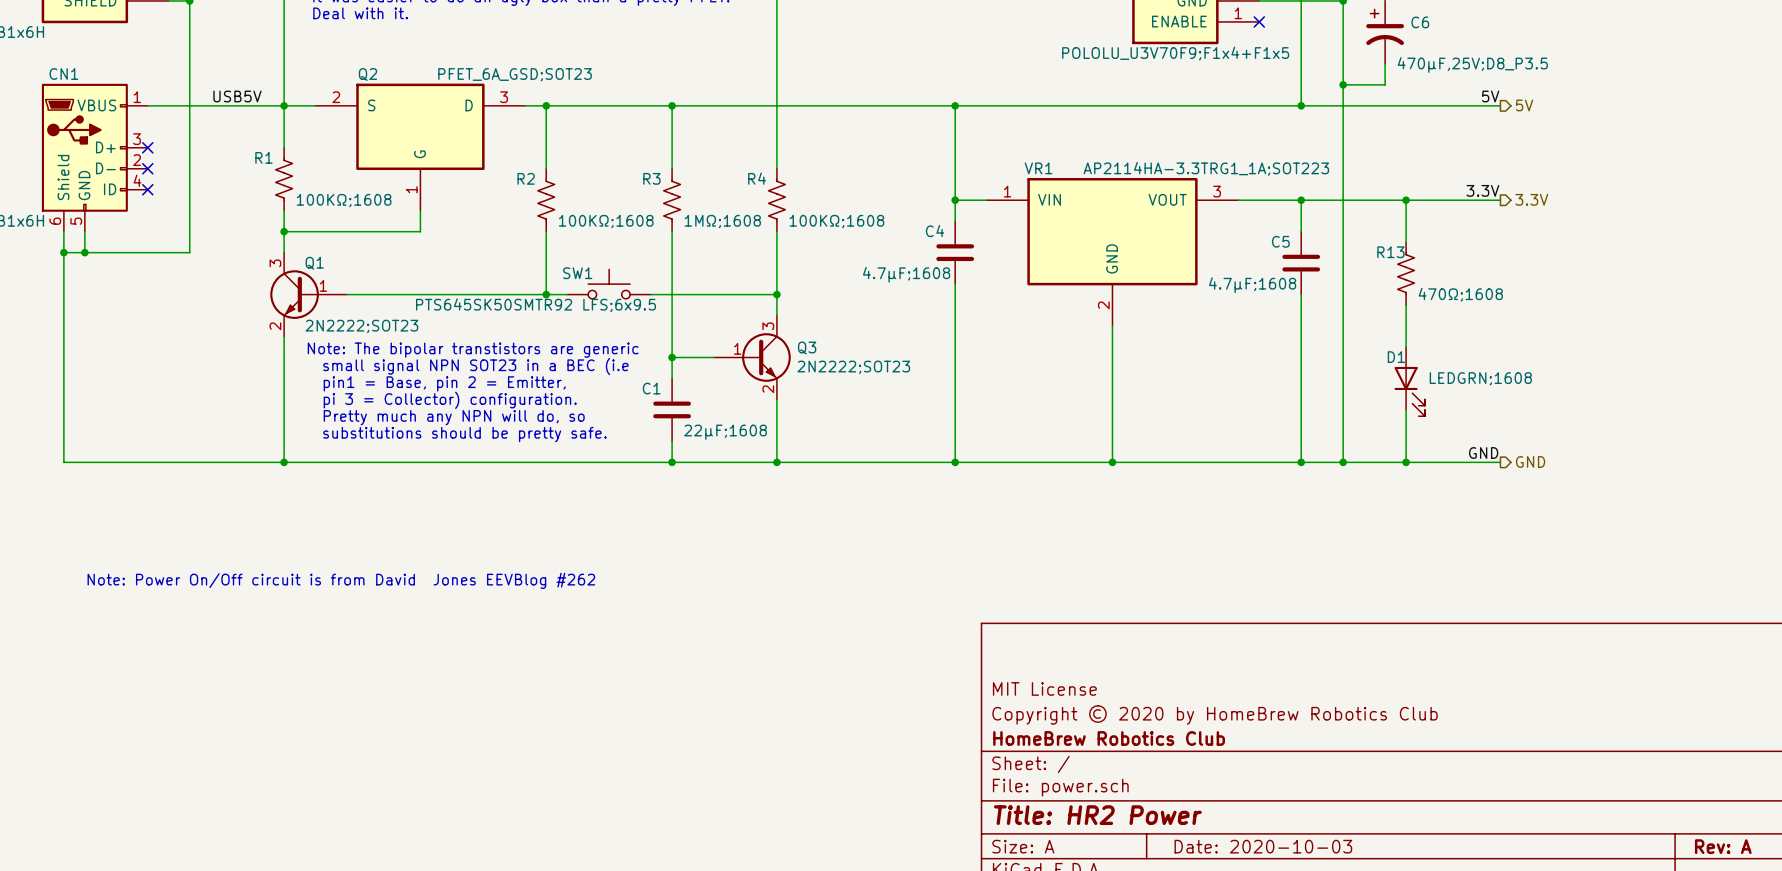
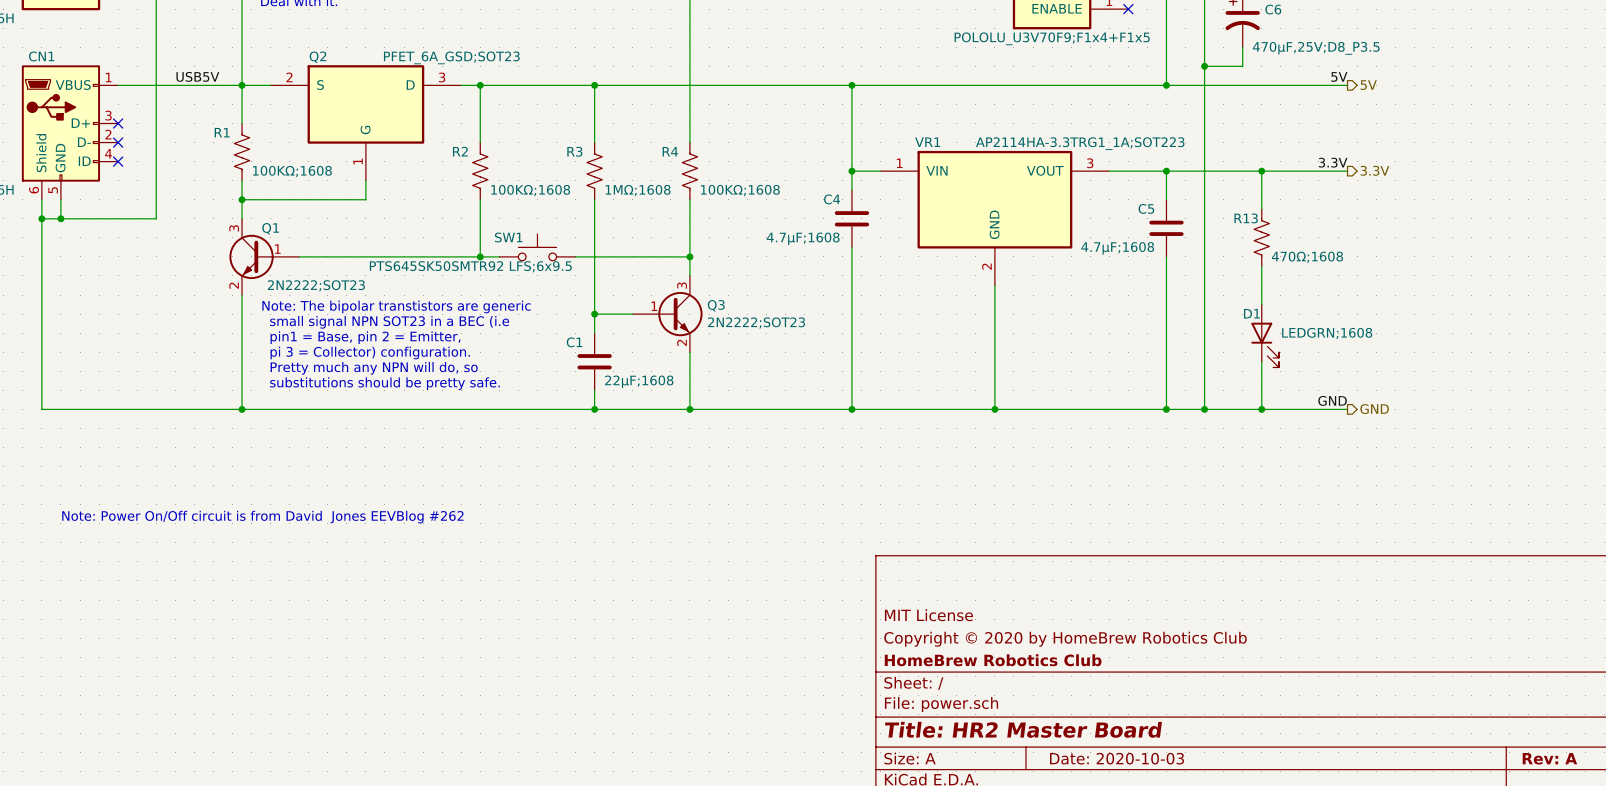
title block: Title: HR2 Power (1097, 815) -> Title: HR2 Master Board (1023, 729)

